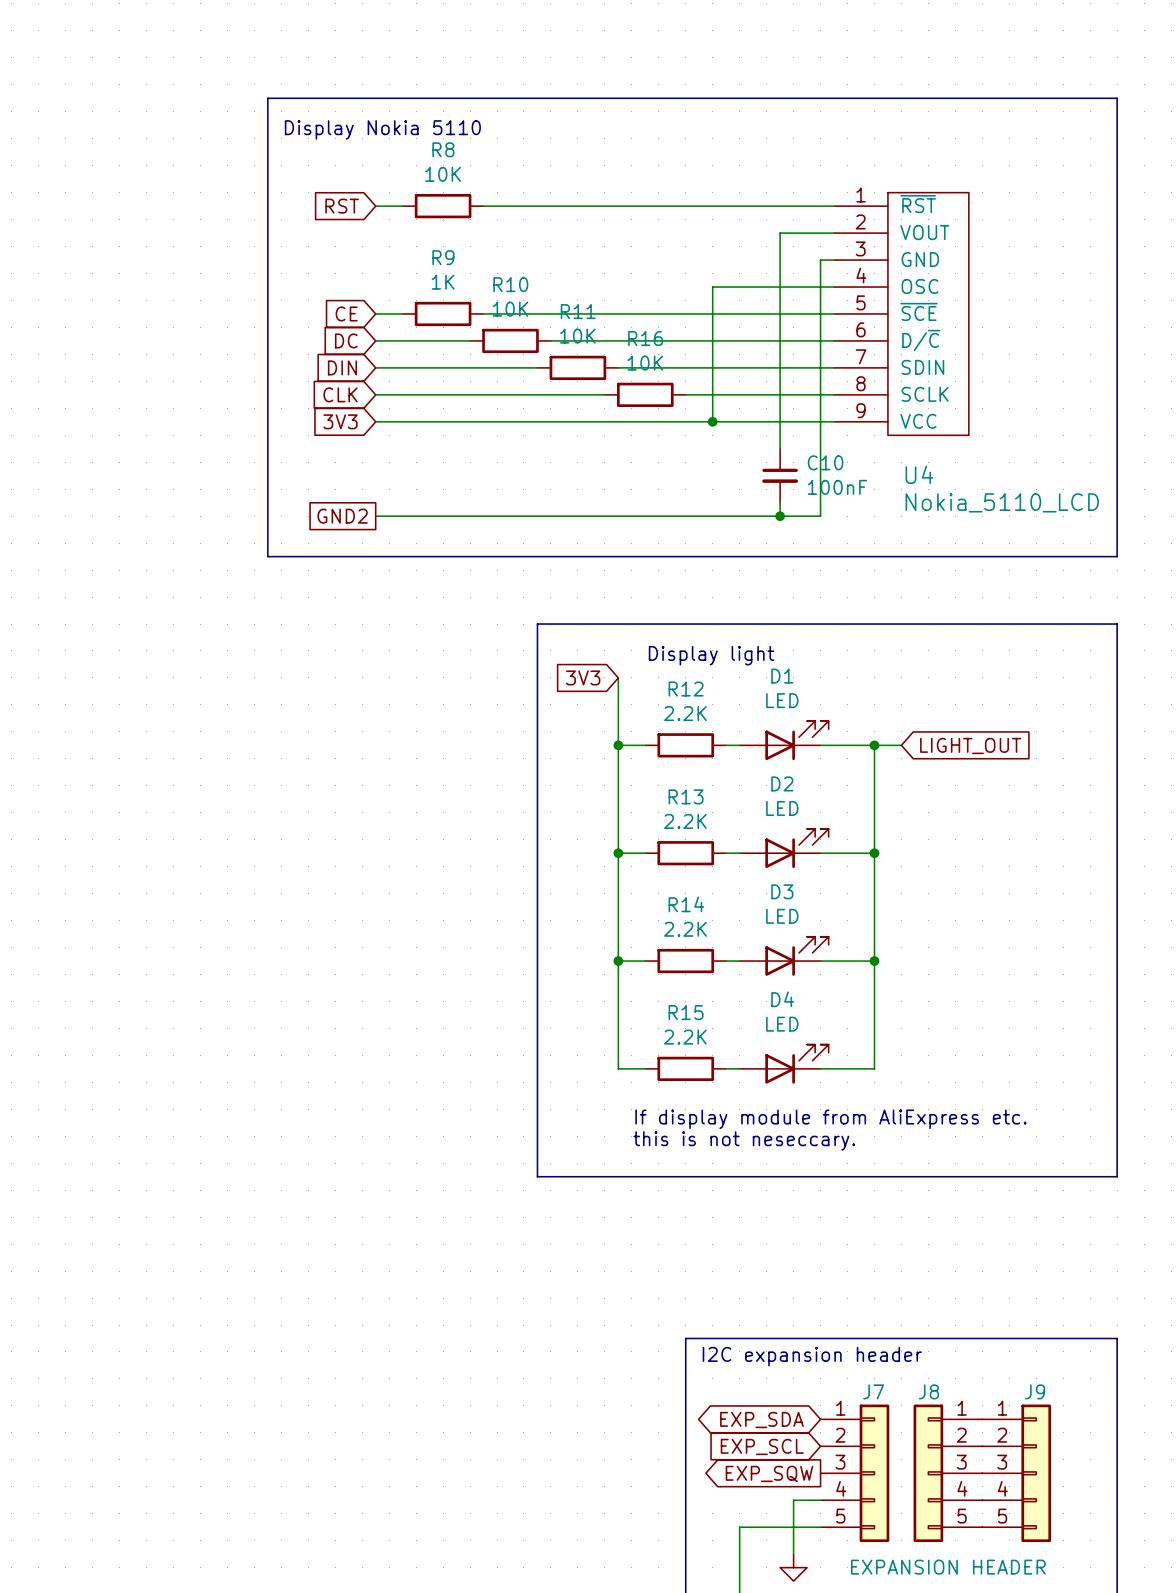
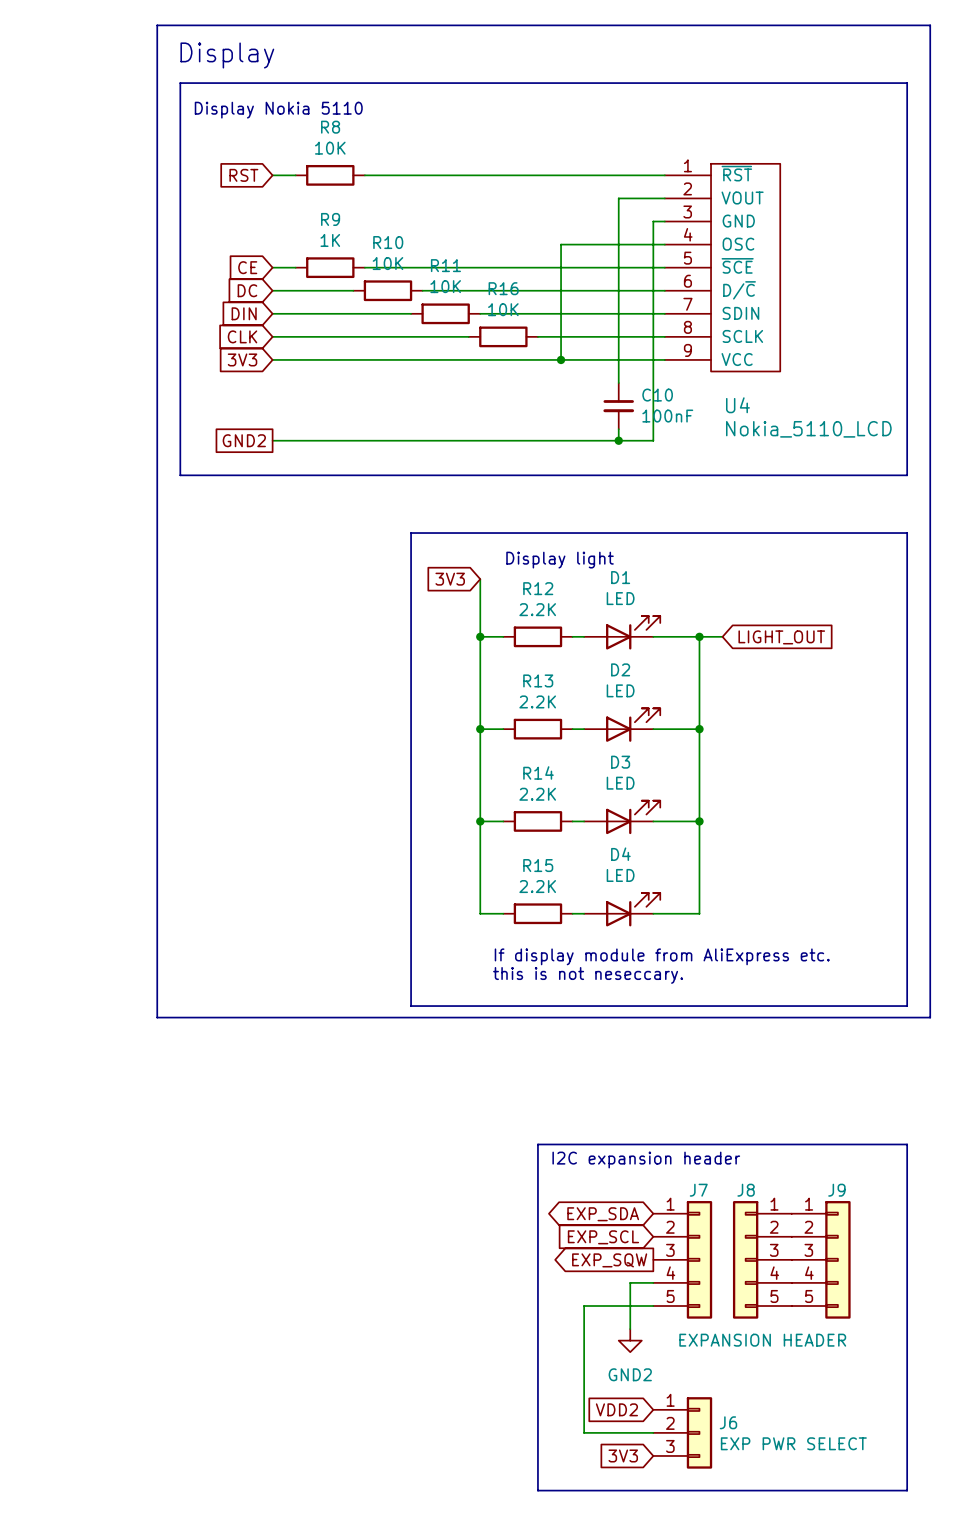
line: none -> (157, 25) (930, 25) (930, 1017) (157, 1017) (157, 25)
text: none -> Display (227, 55)

